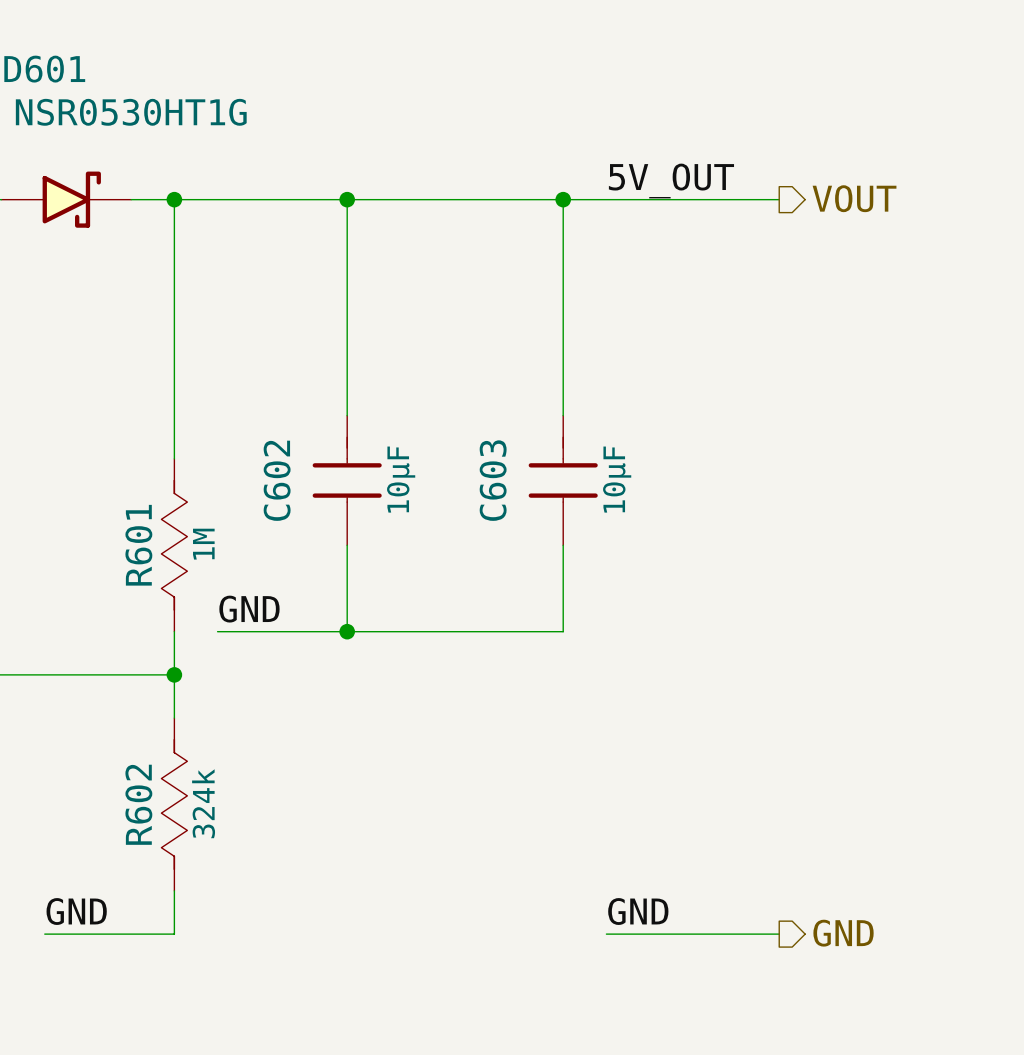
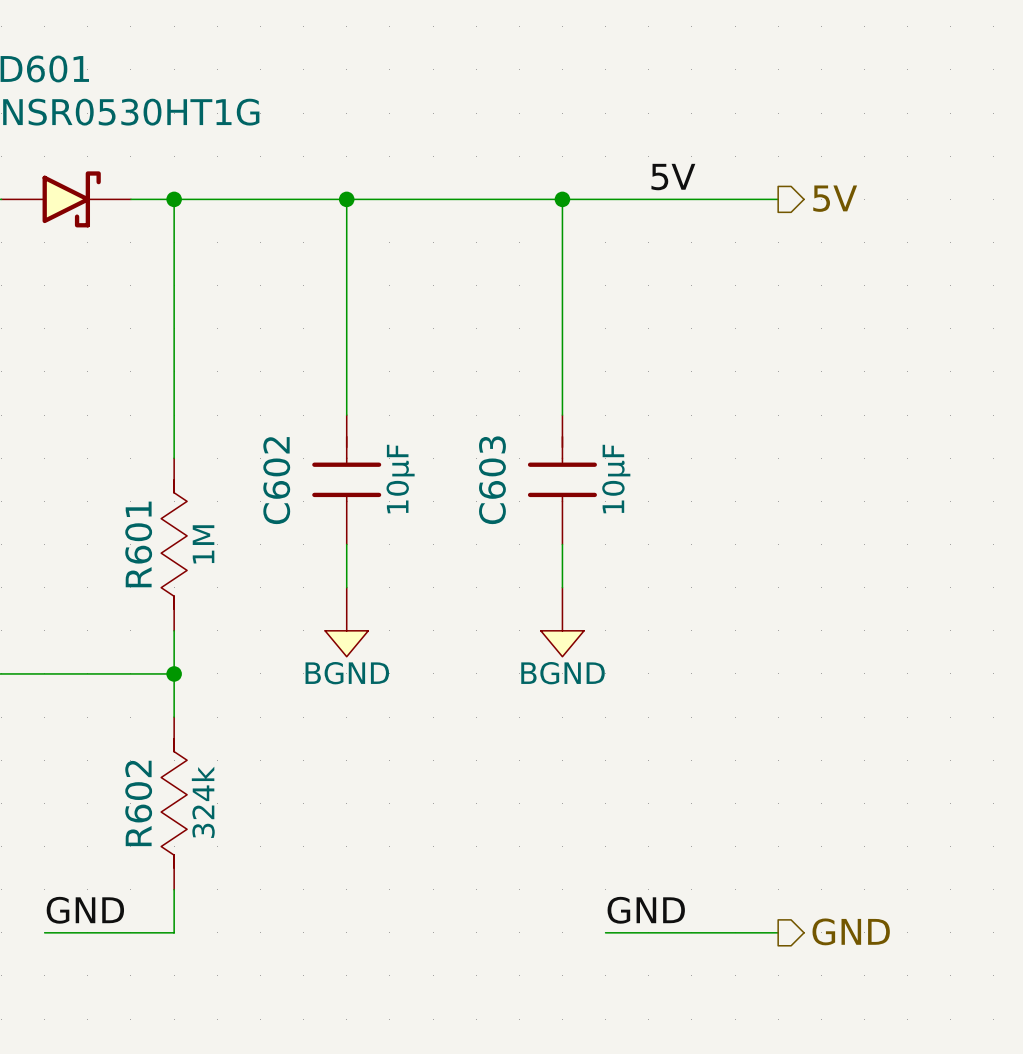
label: none -> 5V (673, 177)
label: 5V_OUT (671, 181) -> none
hierarchical label: VOUT (854, 198) -> 5V (835, 198)
wire: (563, 588) (563, 631) (217, 631) -> none
label: GND (249, 609) -> none
power symbol: none -> BGND (346, 622)
power symbol: none -> BGND (562, 622)
junction: (347, 631) -> none

